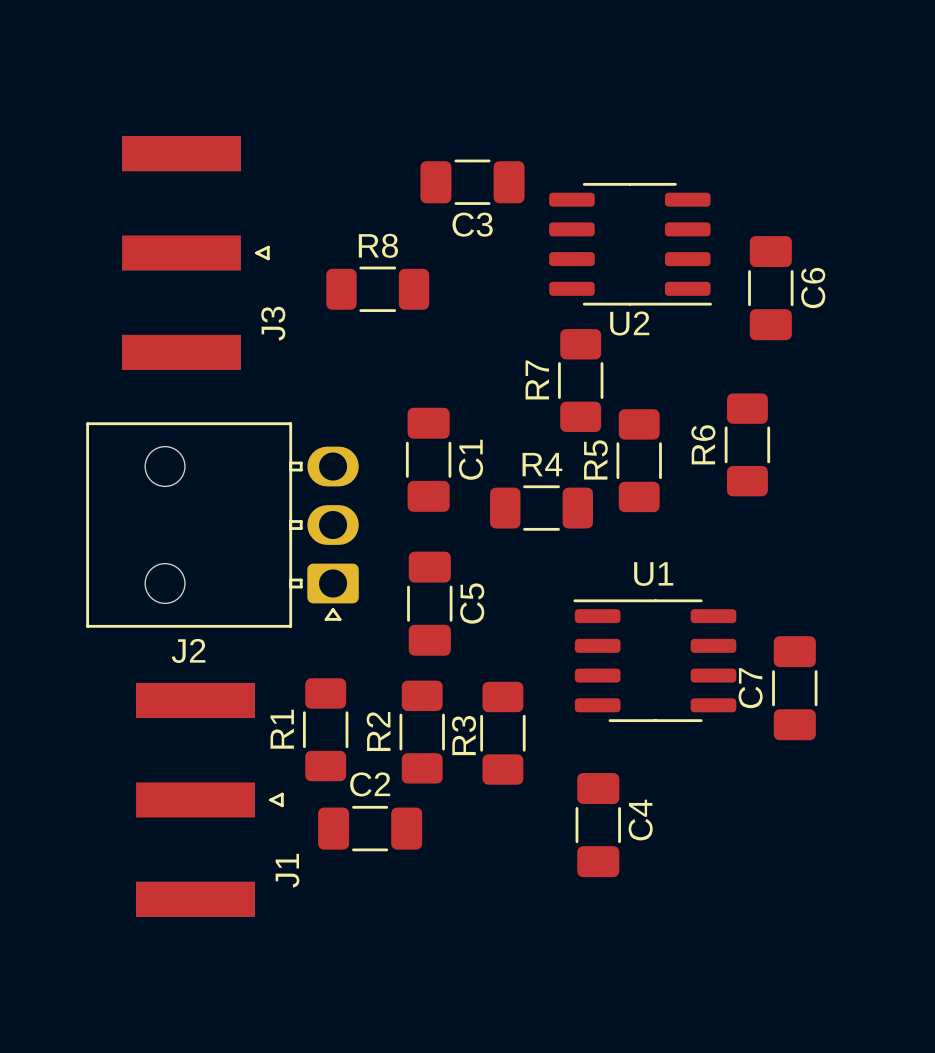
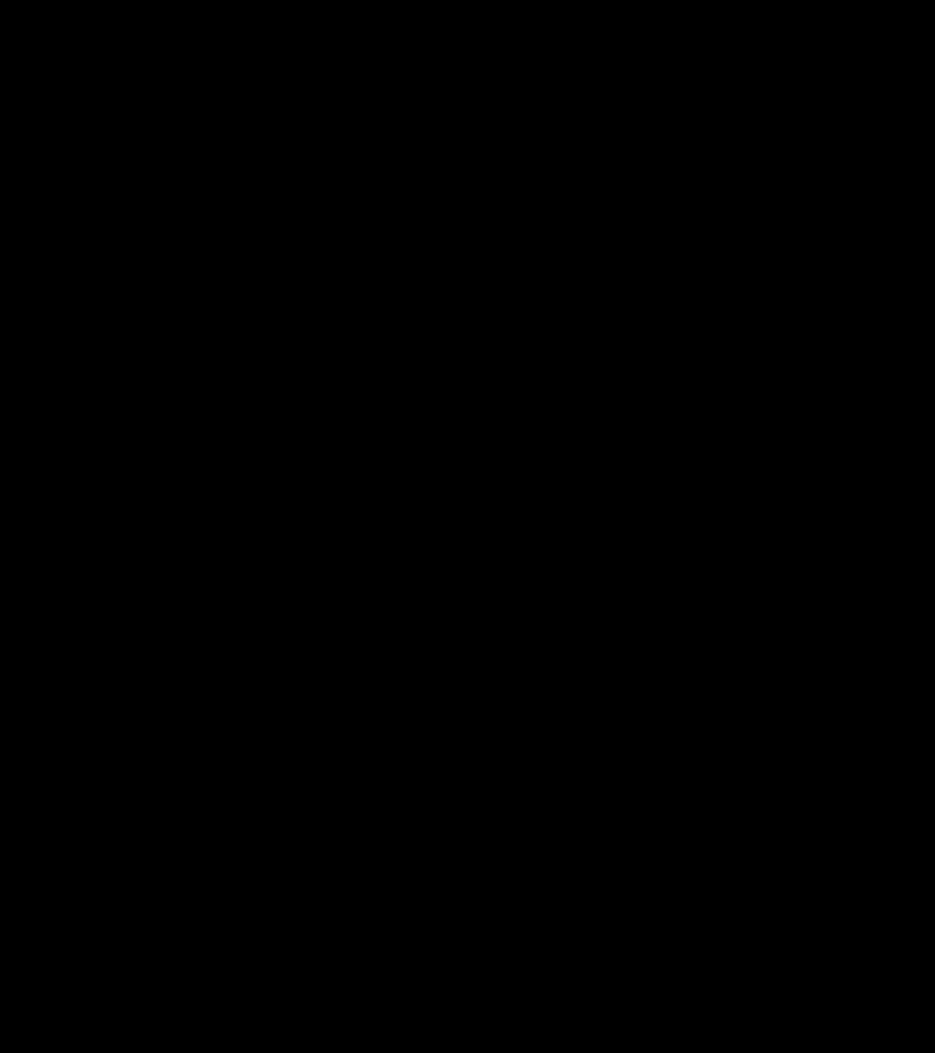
C3: (472, 182) -> none
U2: (630, 244) -> none
J3: (195, 253) -> none
C6: (770, 288) -> none
R8: (377, 289) -> none
R7: (580, 380) -> none
R6: (747, 444) -> none
C1: (428, 459) -> none
R5: (639, 460) -> none
R4: (541, 508) -> none
J2: (222, 525) -> none
C5: (429, 603) -> none
U1: (654, 660) -> none
C7: (794, 688) -> none
R1: (325, 729) -> none
R2: (422, 732) -> none
R3: (502, 733) -> none
J1: (209, 799) -> none
C4: (598, 825) -> none
C2: (370, 828) -> none

